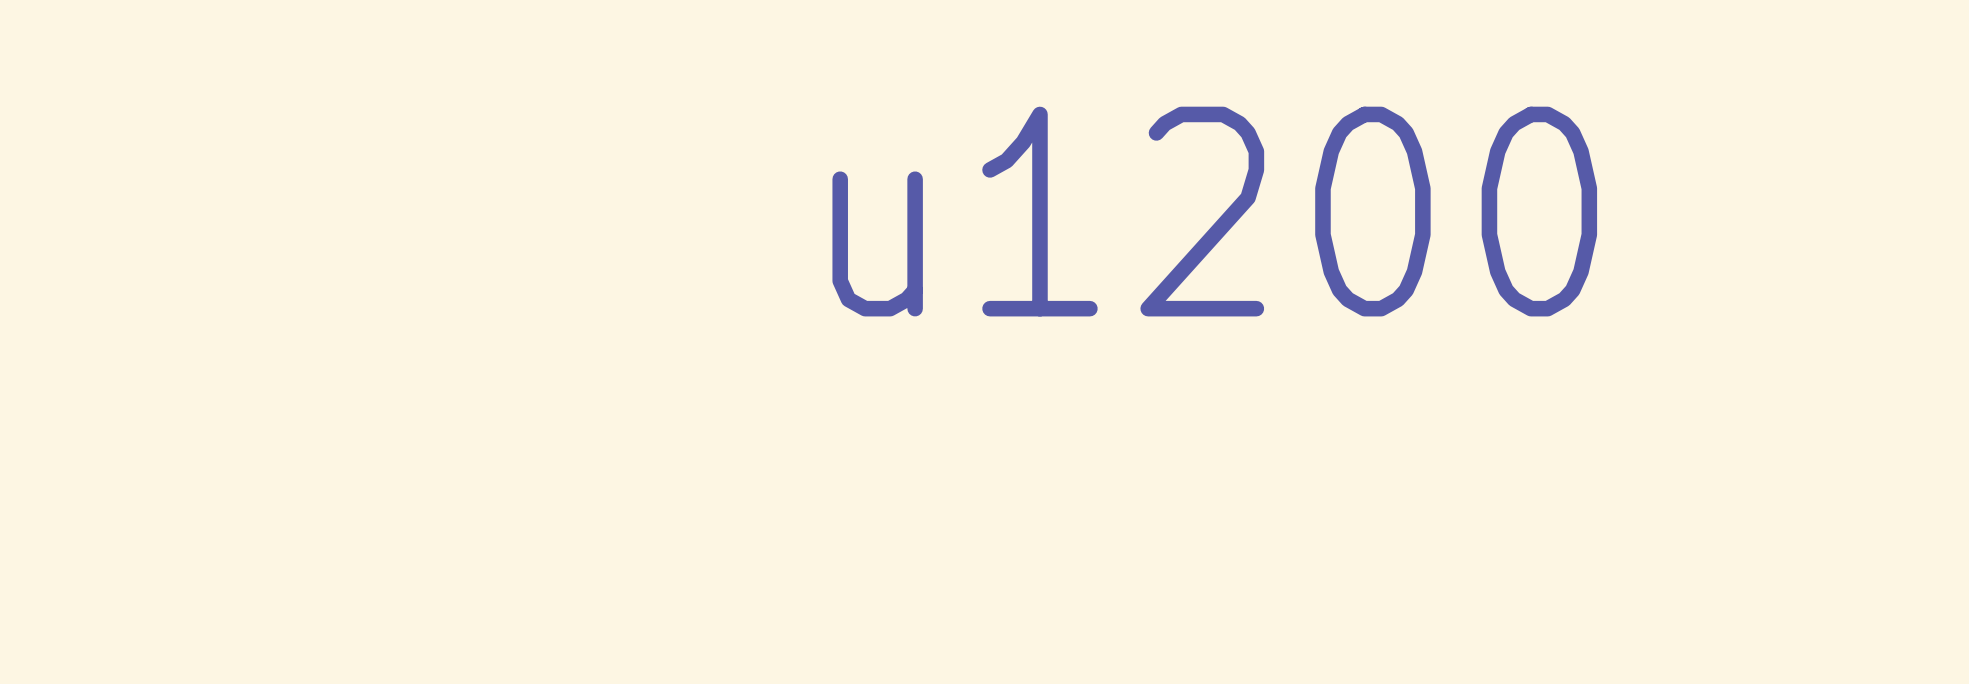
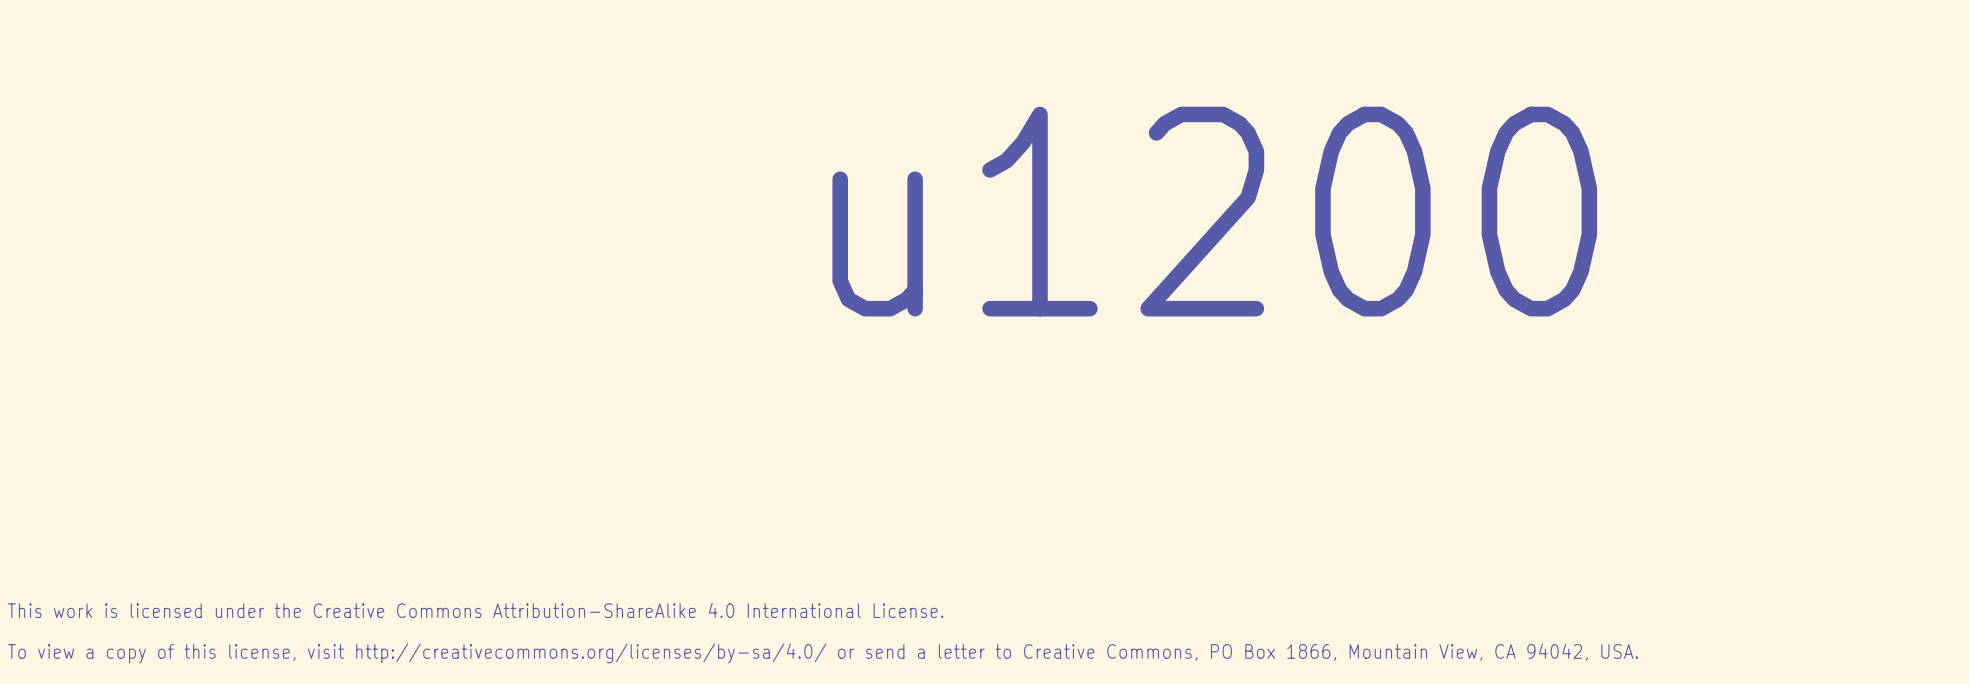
text: none -> This work is licensed under the Creative Commons Attribution-ShareAlike 4.0 International License. (475, 610)
text: none -> To view a copy of this license, visit http://creativecommons.org/licenses/by-sa/4.0/ or send a letter to Creative Commons, PO Box 1866, Mountain View, CA 94042, USA. (822, 653)

